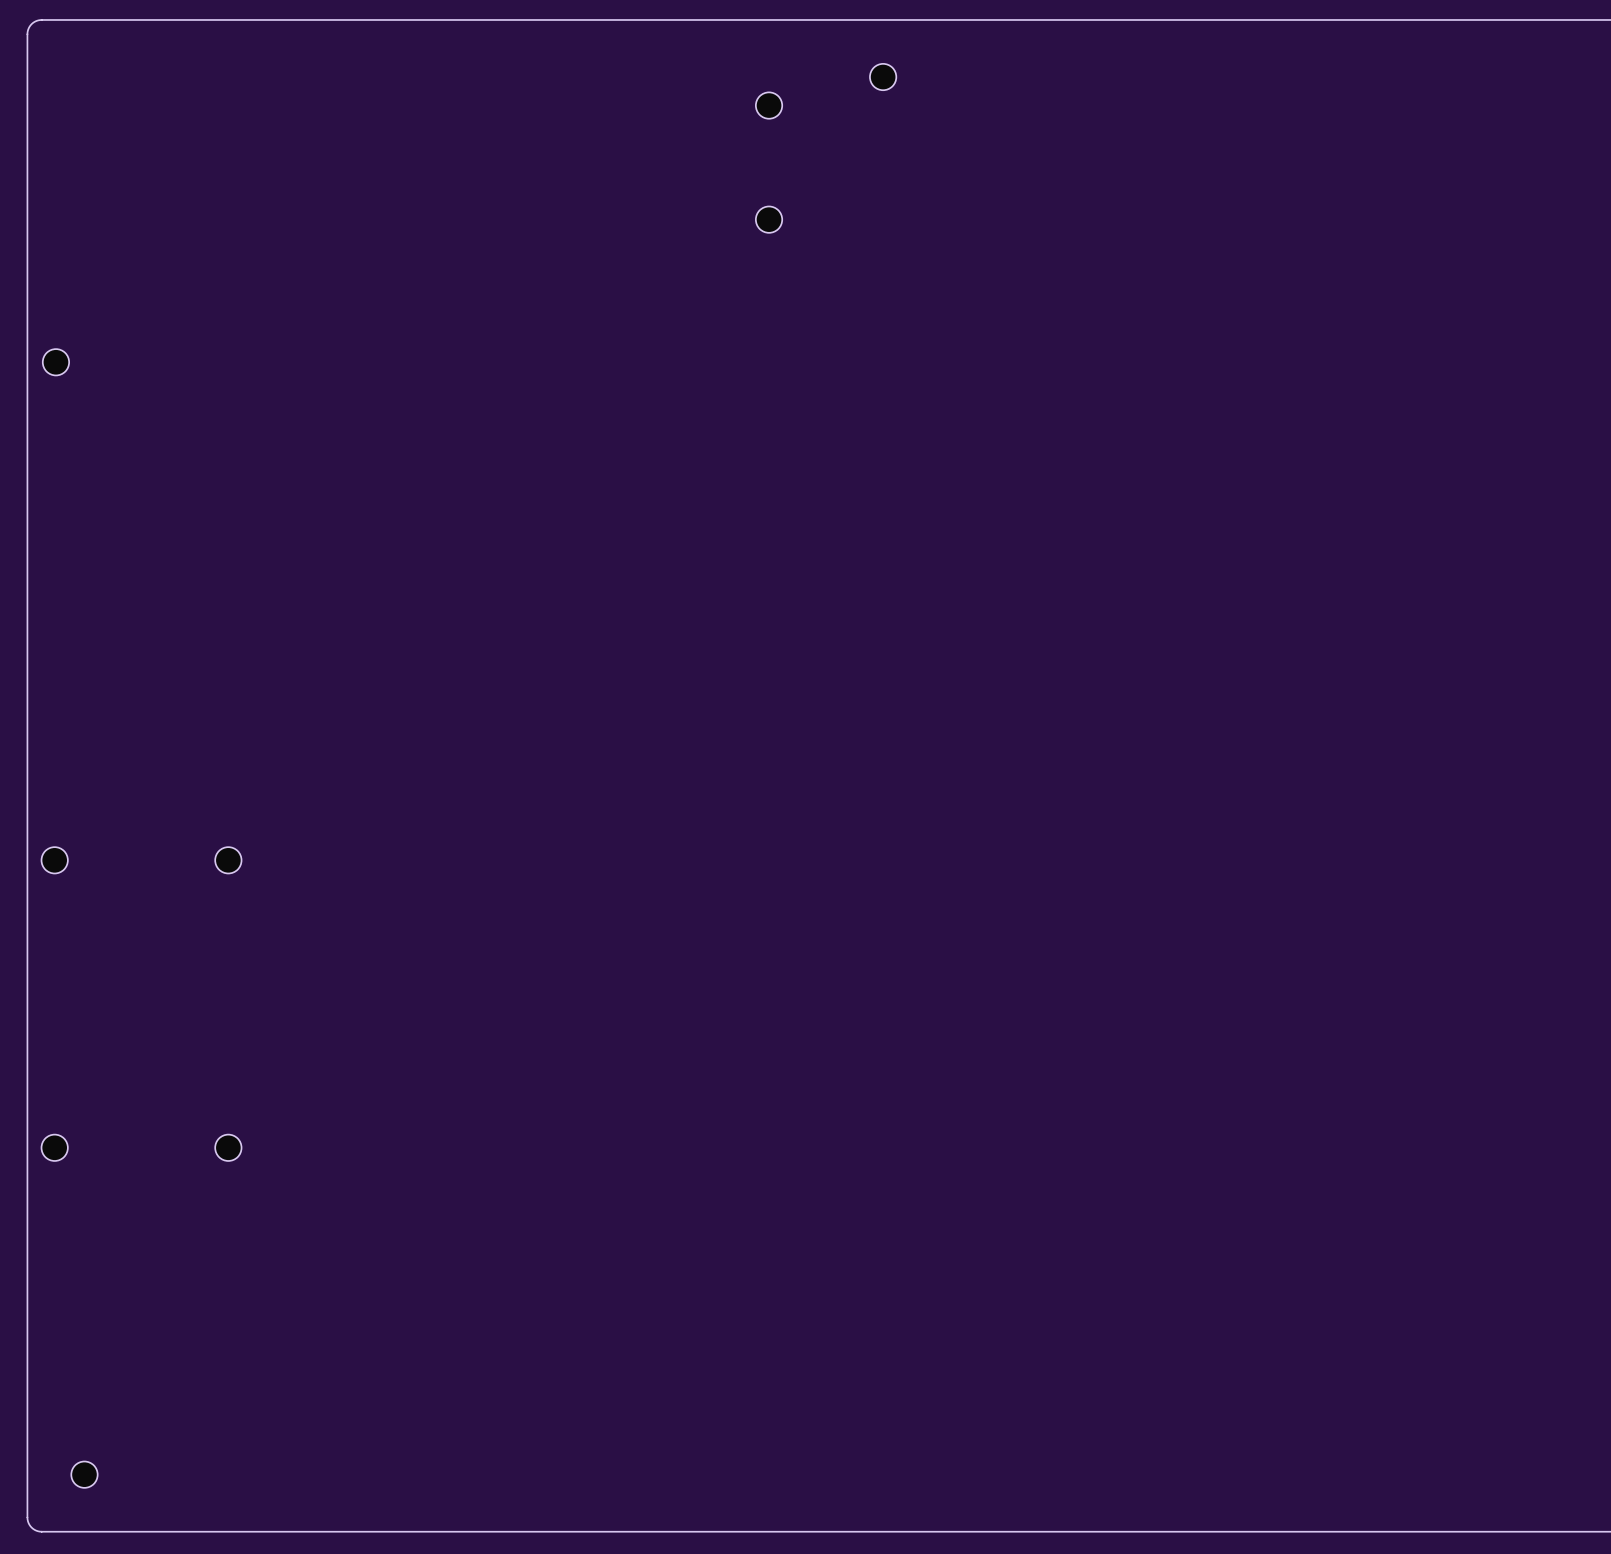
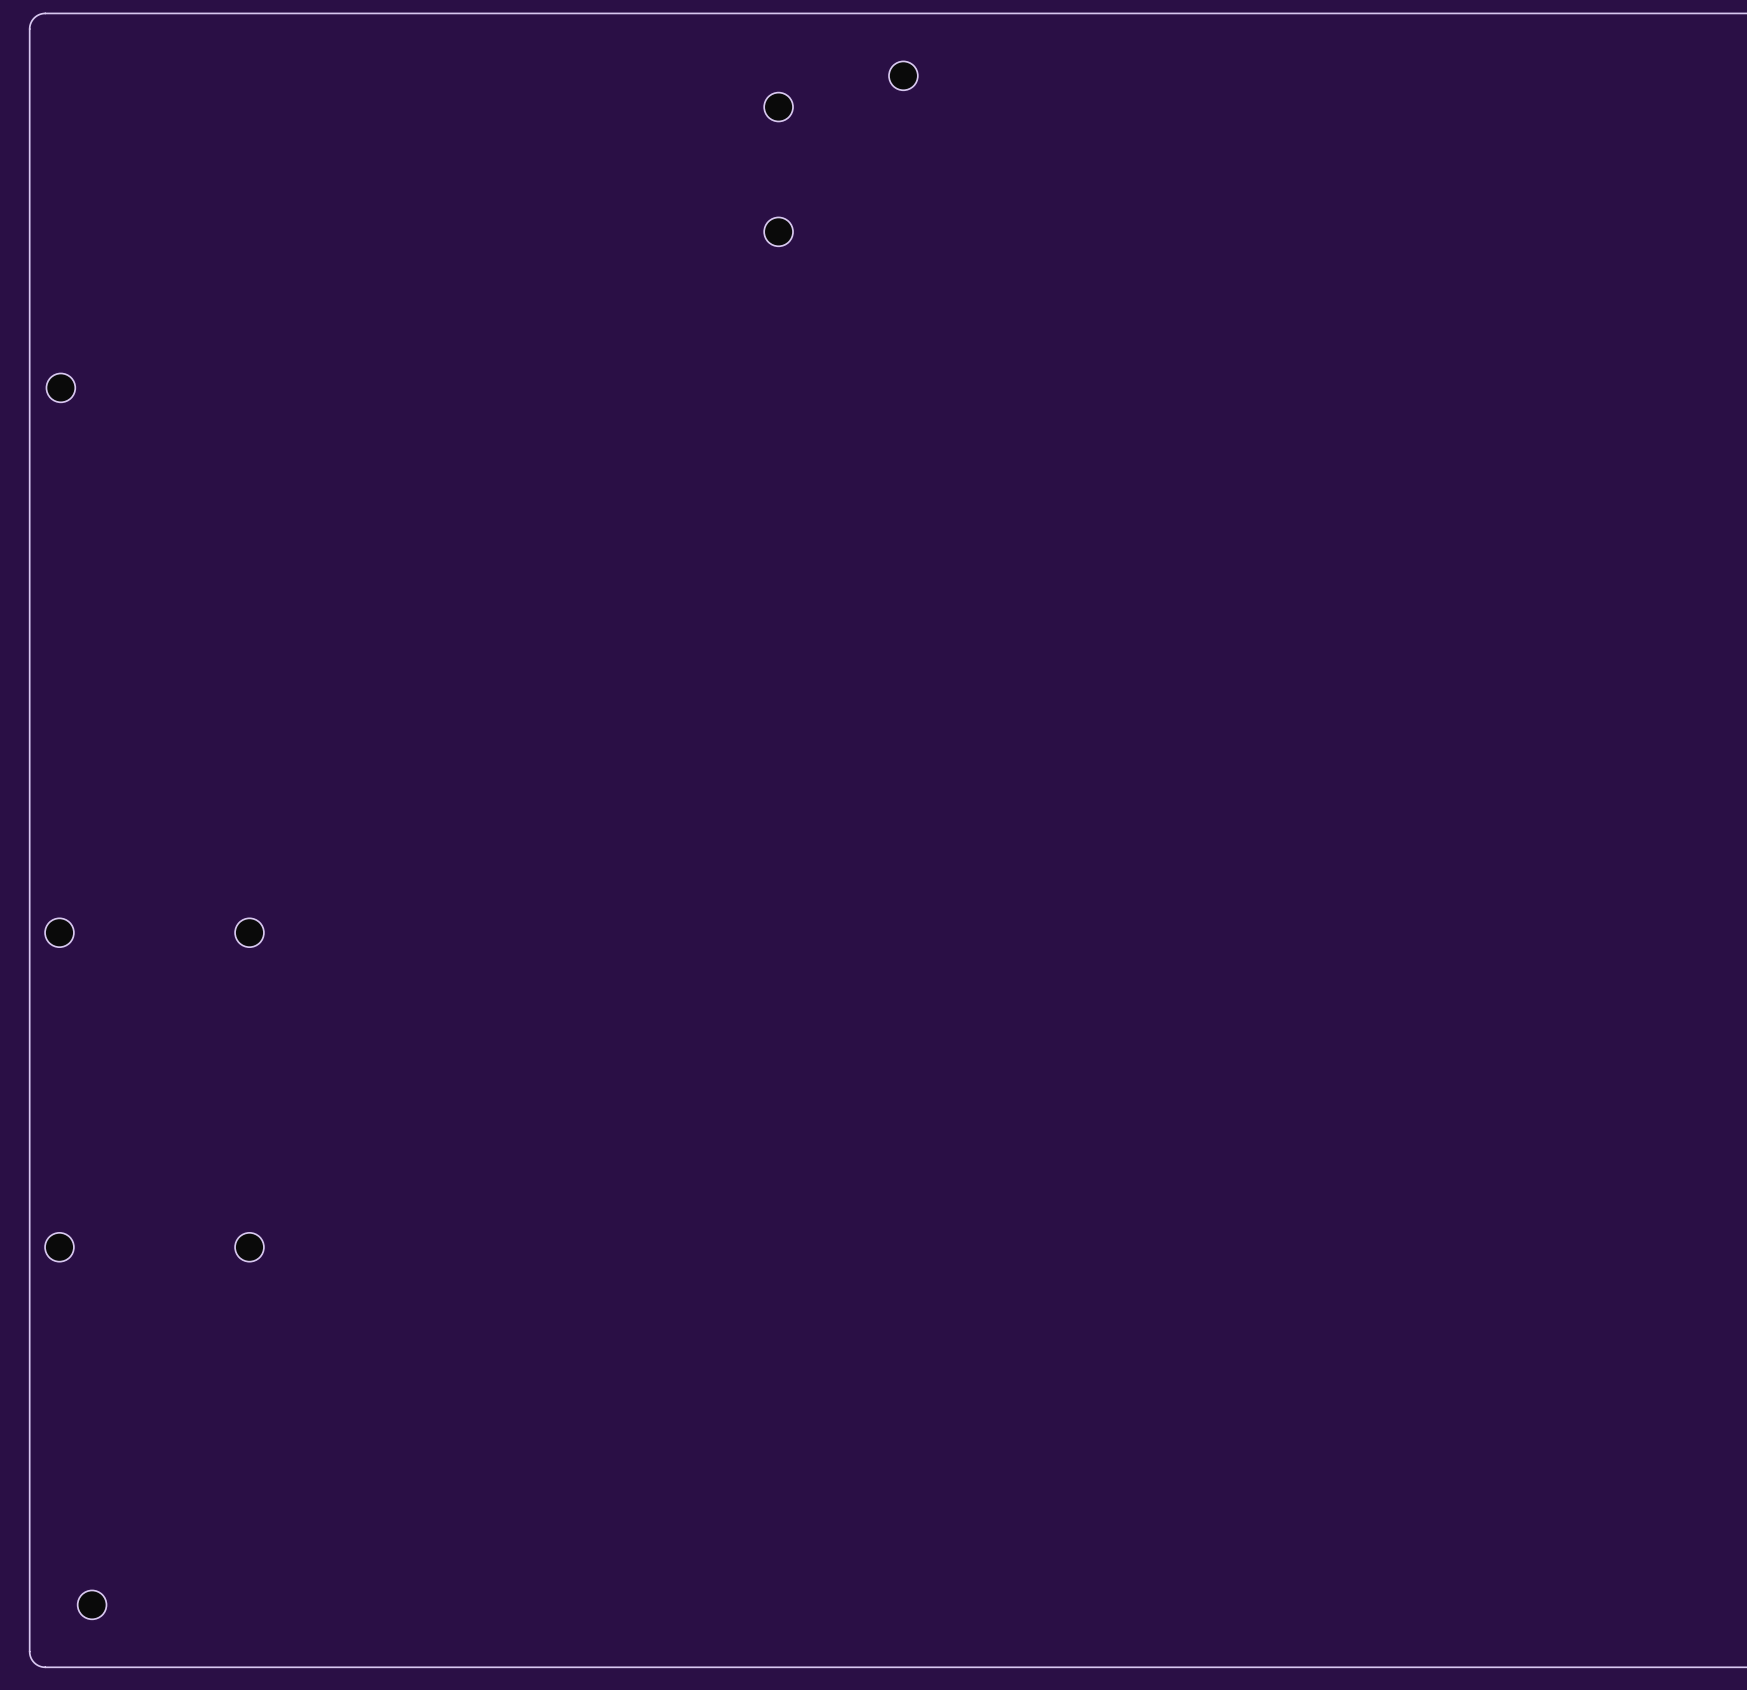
part: none -> (903, 75)
part: (883, 77) -> none
part: none -> (778, 107)
part: (769, 105) -> none
part position: (769, 219) -> (778, 231)

